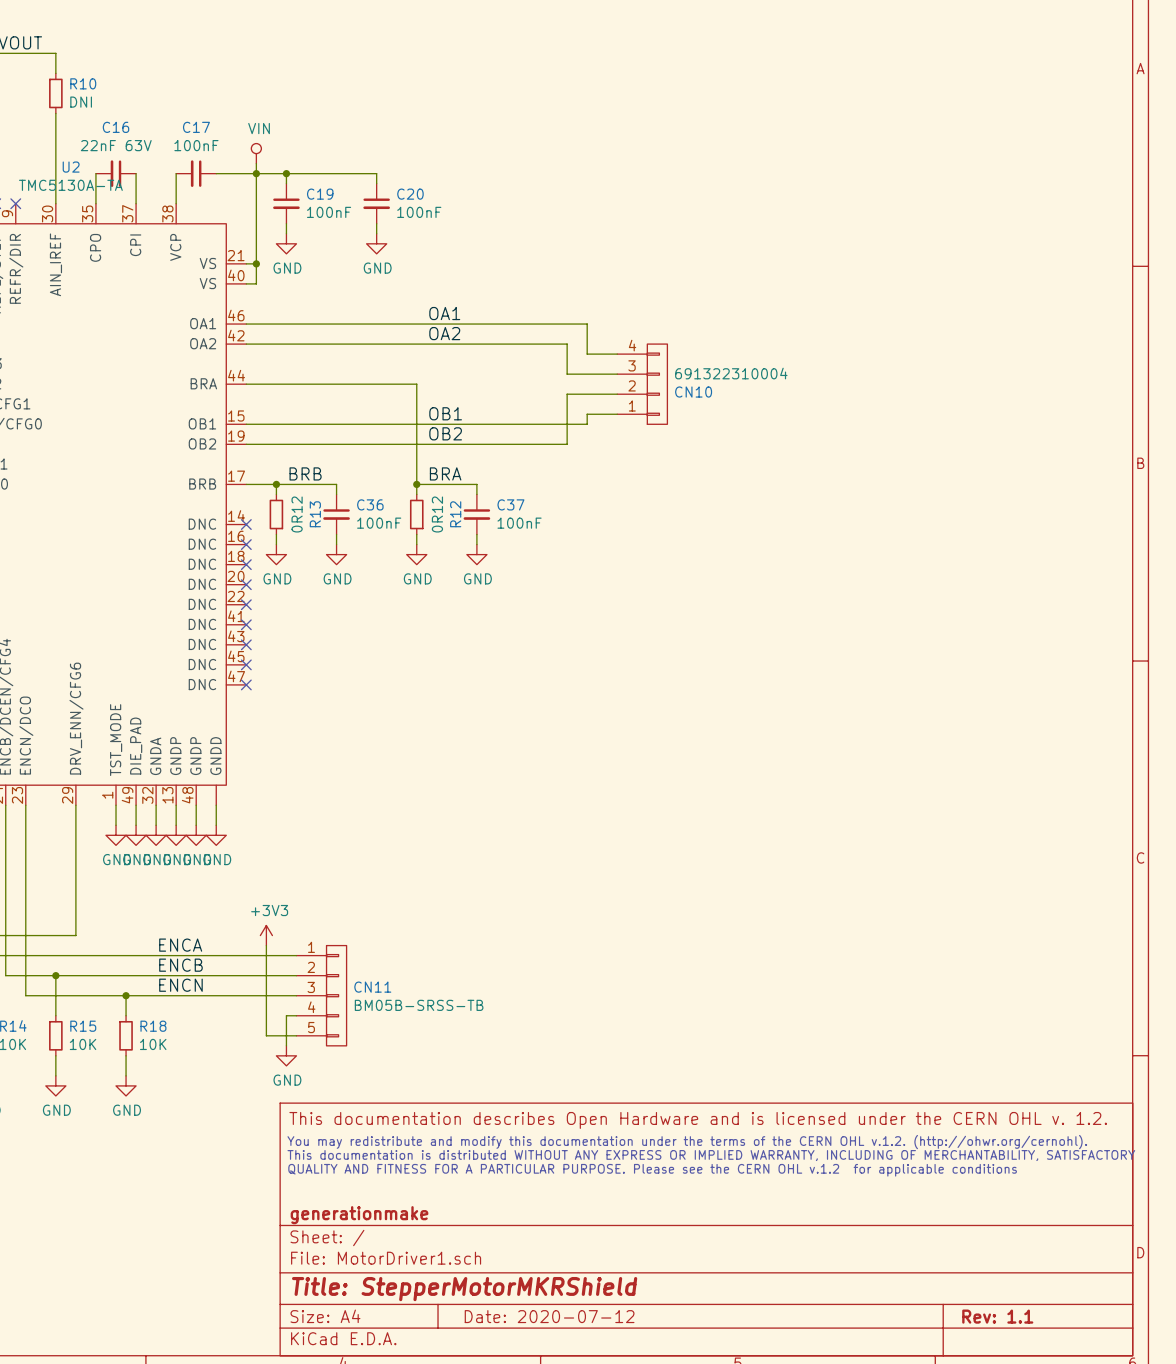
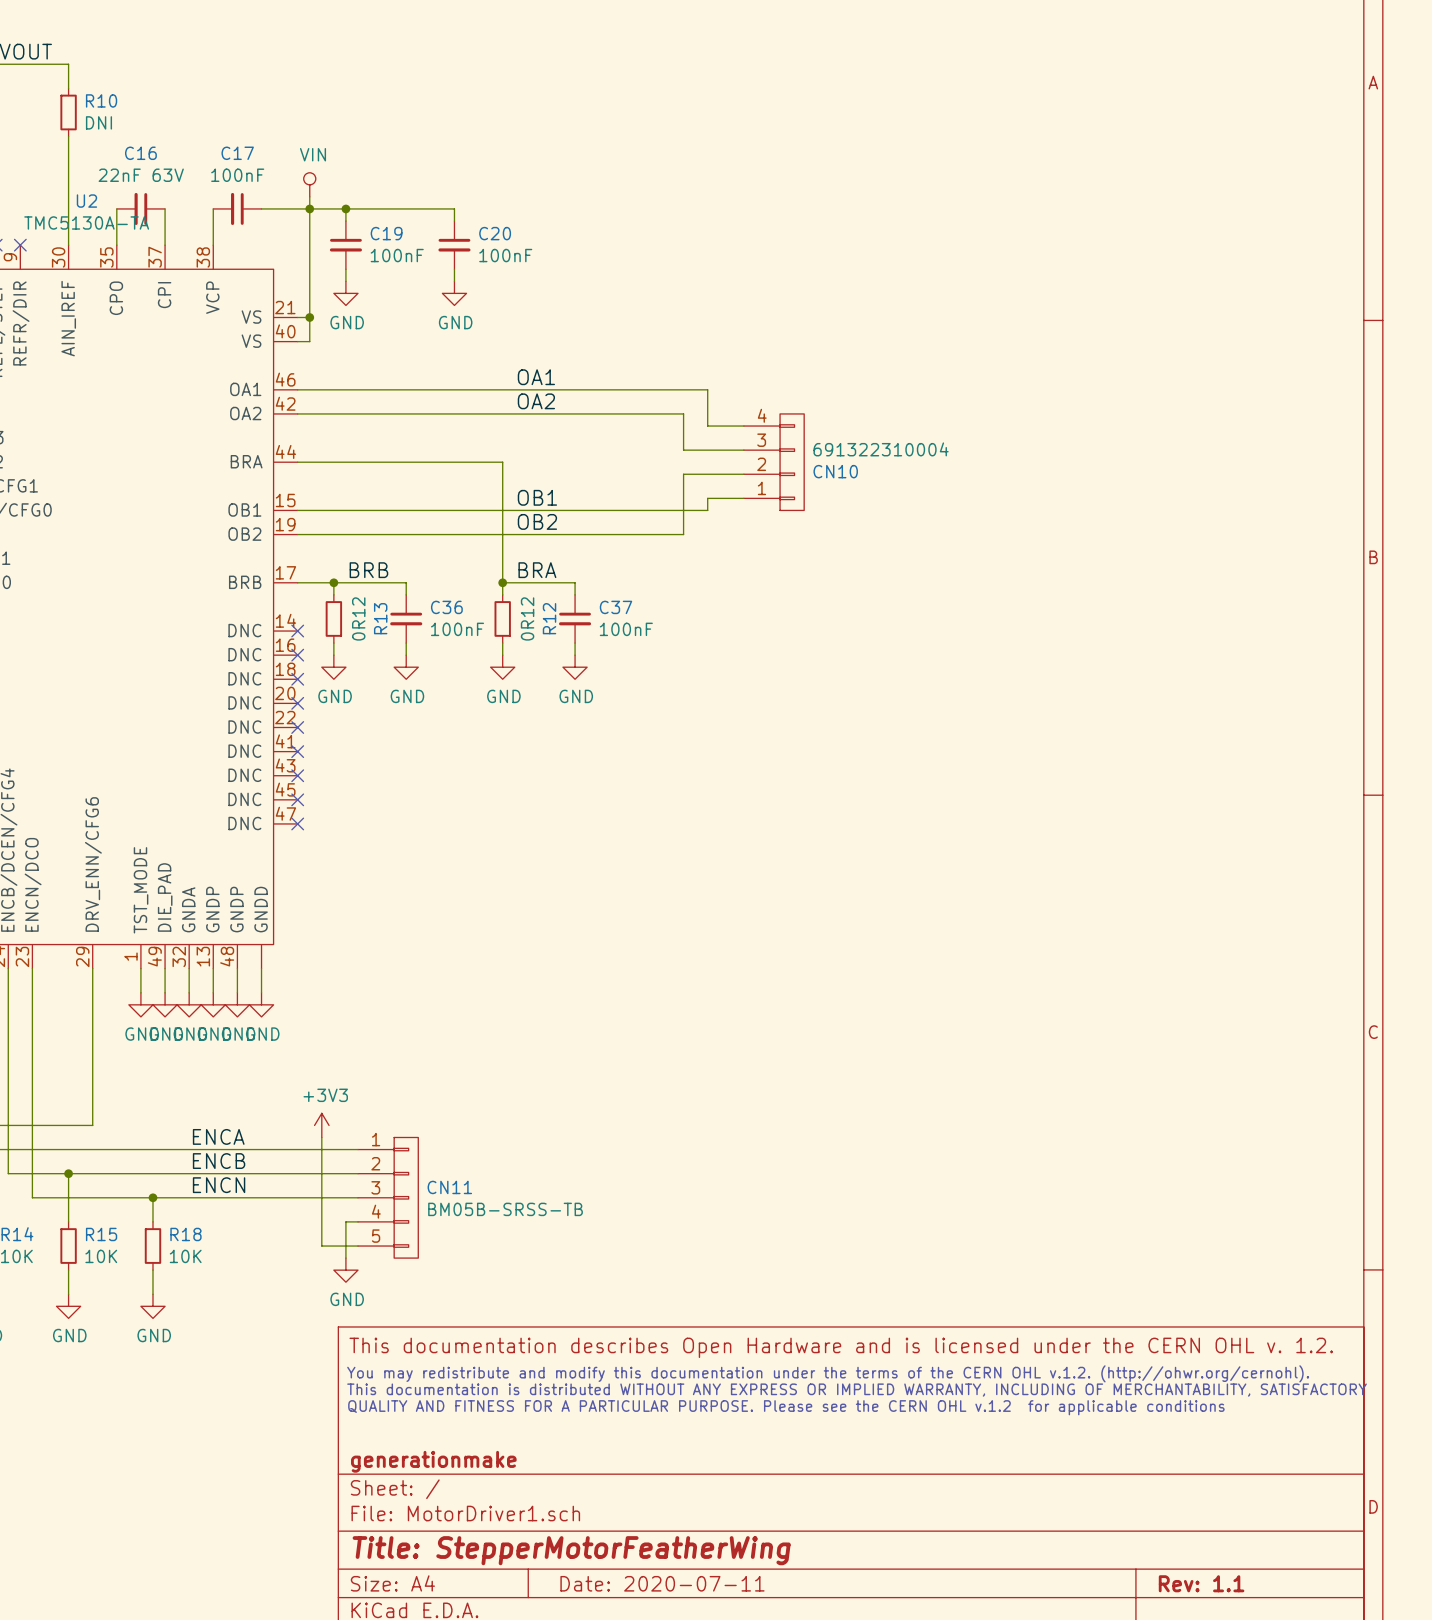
title block: Title: StepperMotorMKRShield (464, 1289) -> Title: StepperMotorFeatherWing (571, 1550)
title block: Date: 2020-07-12 (549, 1316) -> Date: 2020-07-11 (662, 1583)

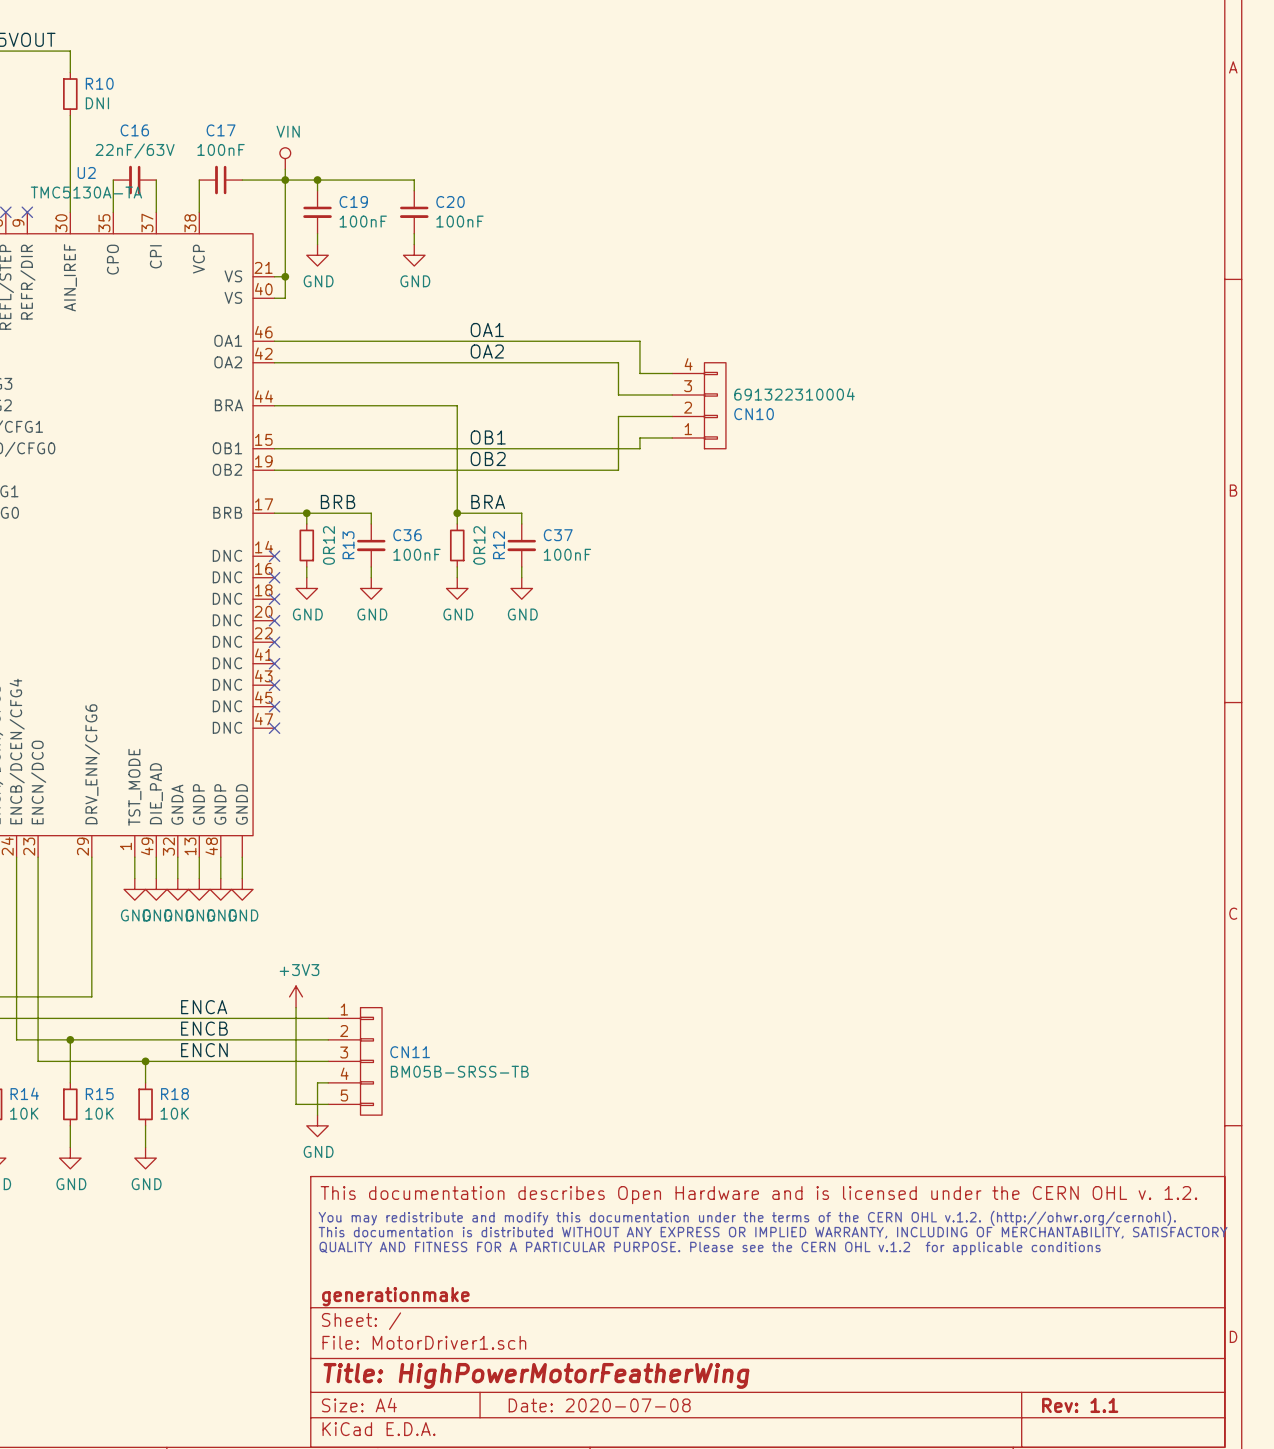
C16 value: 22nF 63V (141, 175) -> 22nF/63V (135, 150)
title block: Title: StepperMotorFeatherWing (571, 1550) -> Title: HighPowerMotorFeatherWing (536, 1375)
title block: Date: 2020-07-11 (662, 1583) -> Date: 2020-07-08 (599, 1405)

